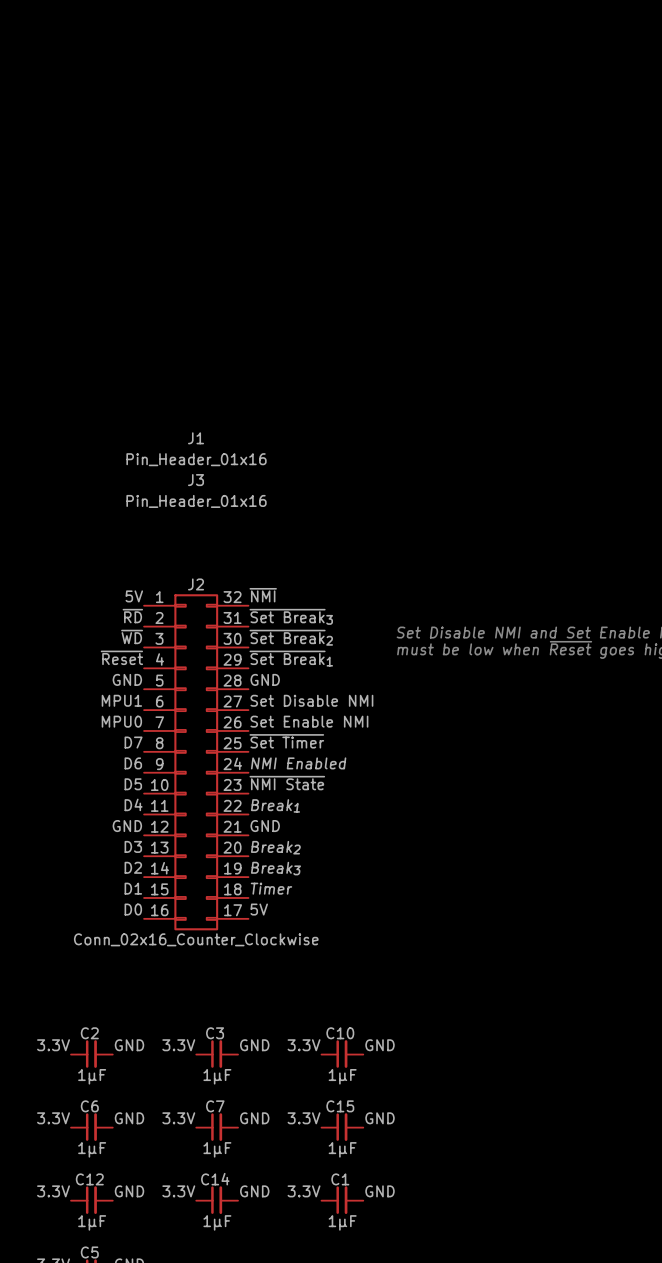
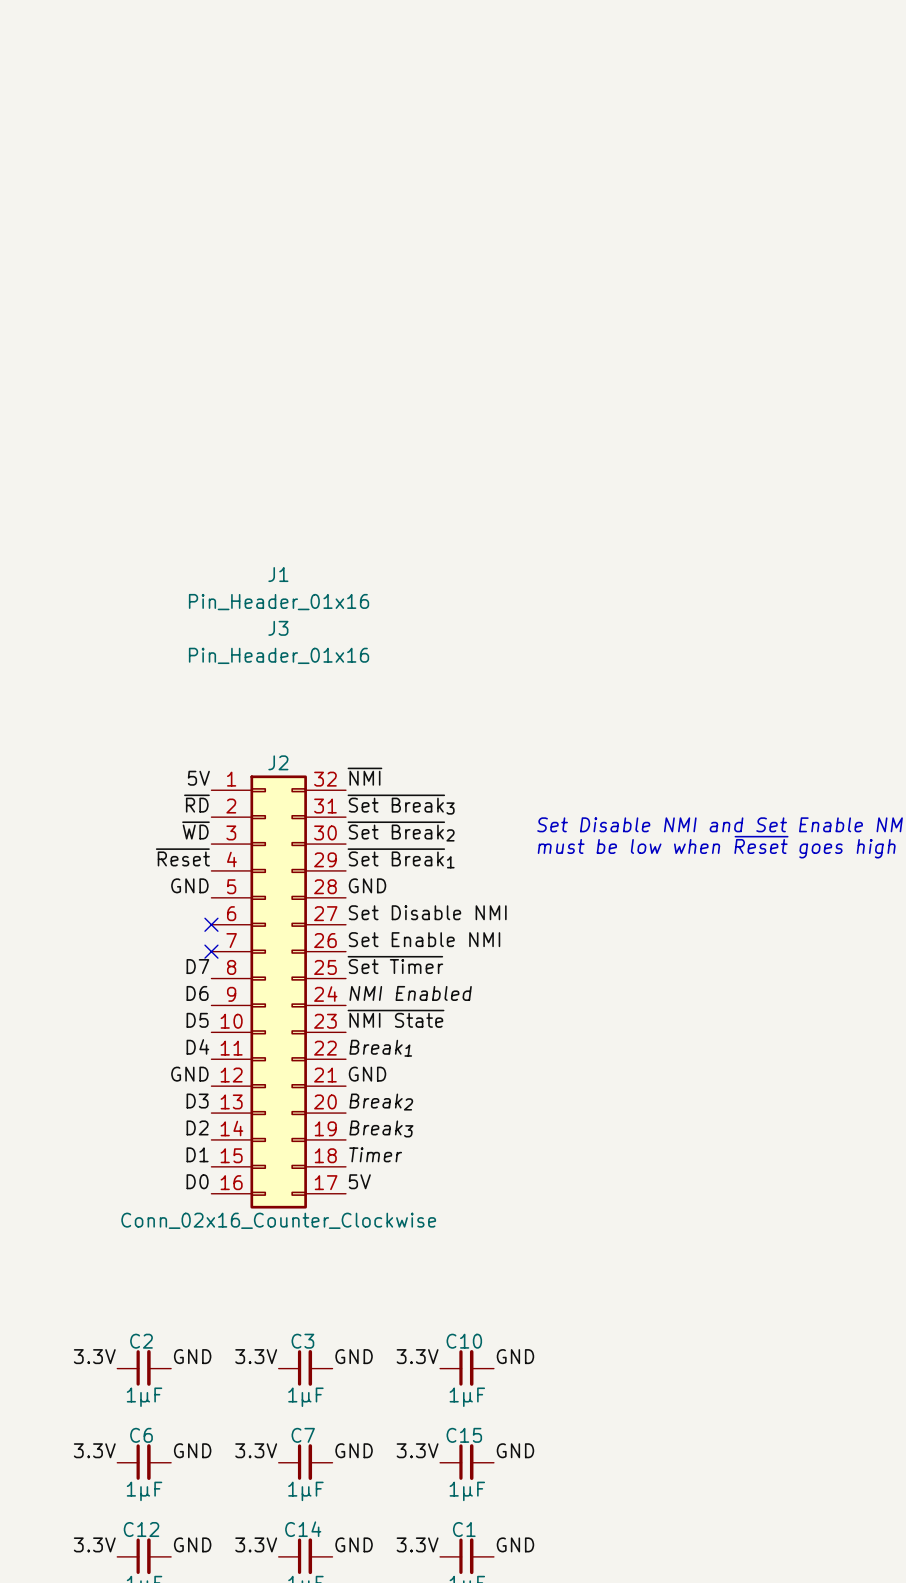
label: MPU1 (121, 700) -> none
no-connect mark: none -> (211, 924)
label: MPU0 (121, 721) -> none
no-connect mark: none -> (211, 951)

